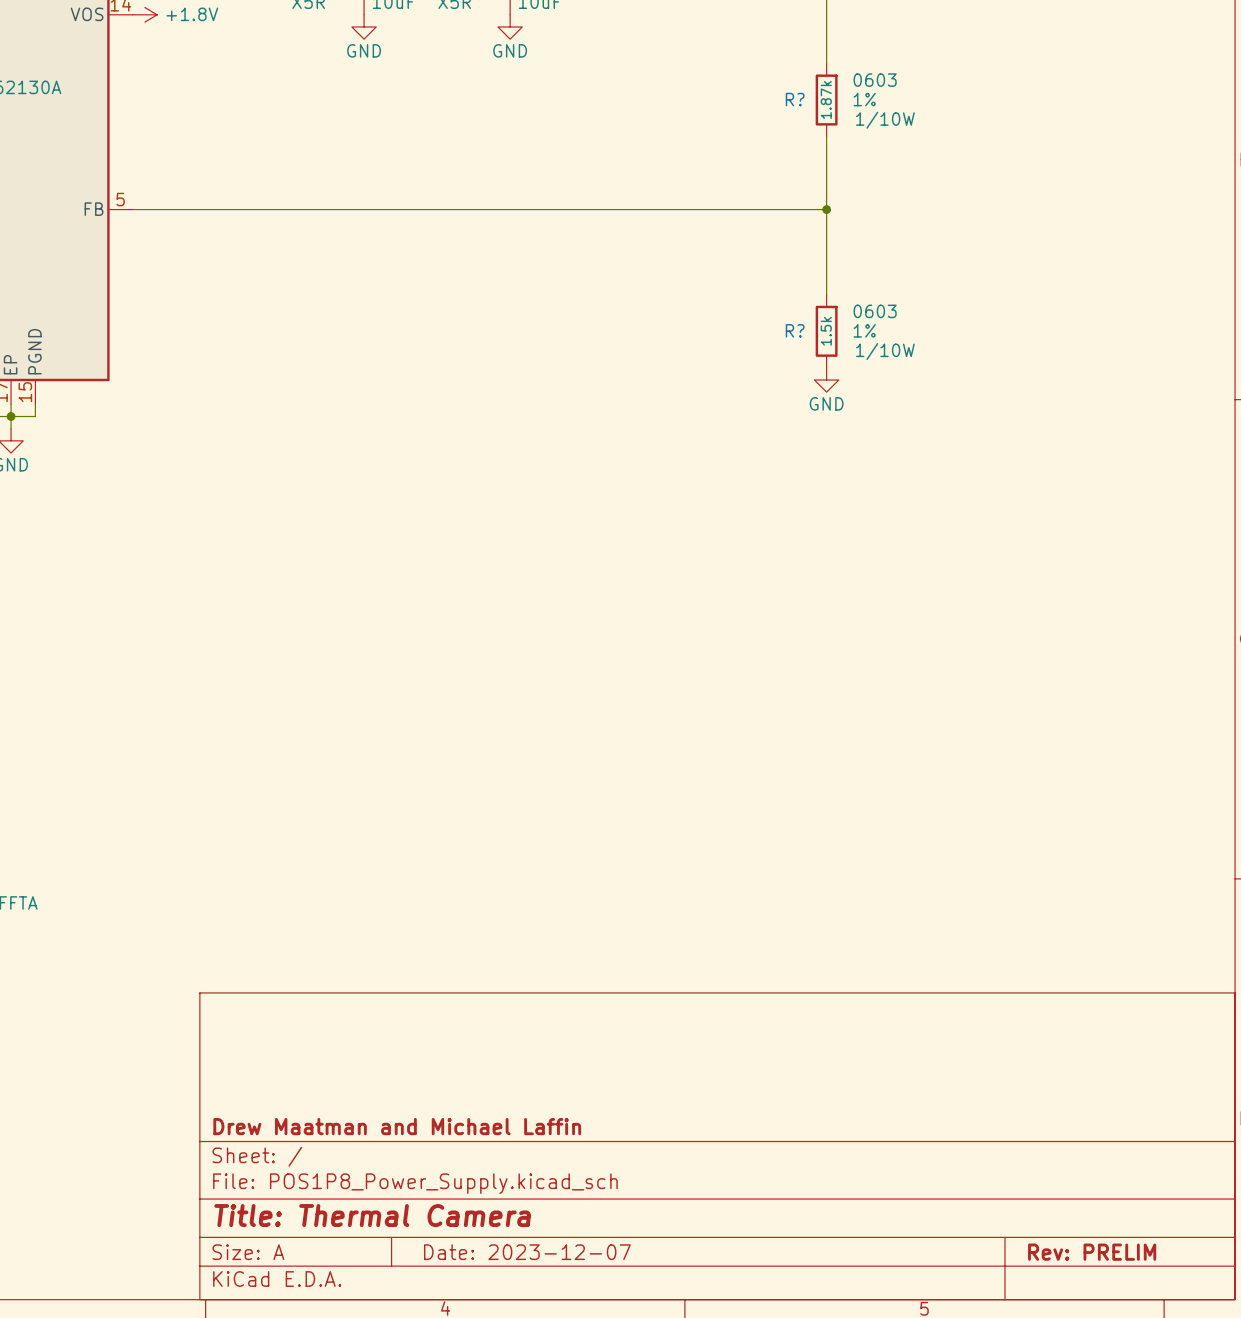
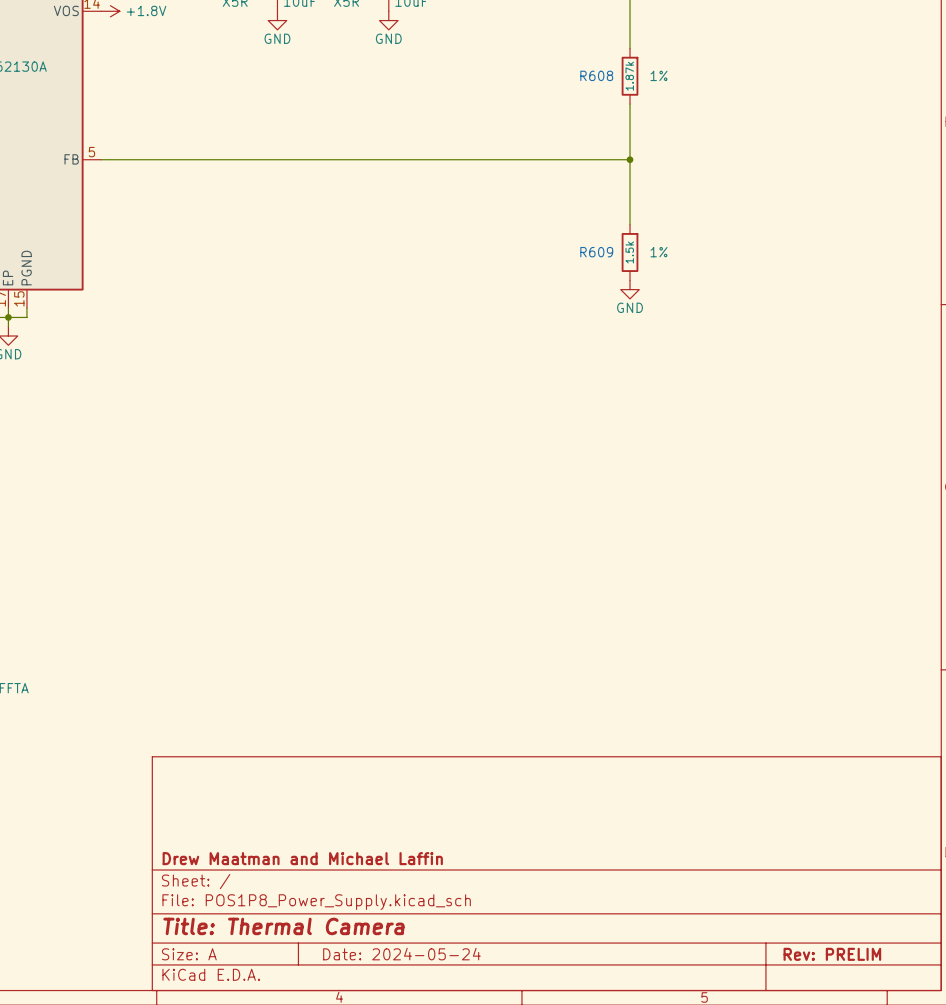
R? text: 0603 (875, 80) -> none
R? name: R? (795, 99) -> R608 (596, 75)
R? text: 1/10W (885, 120) -> none
R? text: 0603 (875, 311) -> none
R? name: R? (795, 330) -> R609 (596, 252)
R? text: 1/10W (885, 351) -> none
title block: Date: 2023-12-07 (527, 1252) -> Date: 2024-05-24 (401, 954)

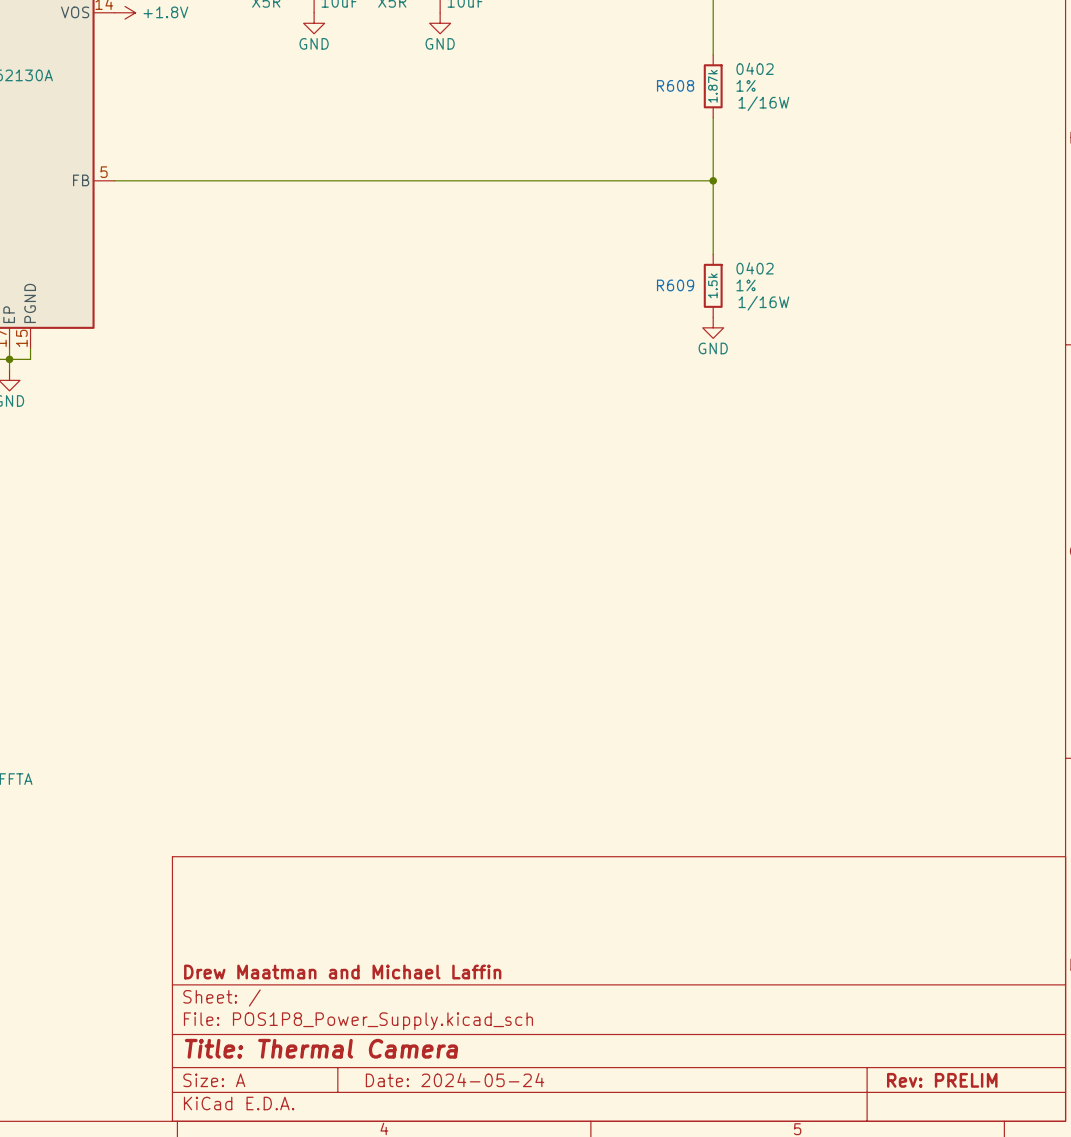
R608 text: none -> 0402 (755, 68)
R608 text: none -> 1/16W (763, 103)
R609 text: none -> 0402 (755, 268)
R609 text: none -> 1/16W (763, 303)

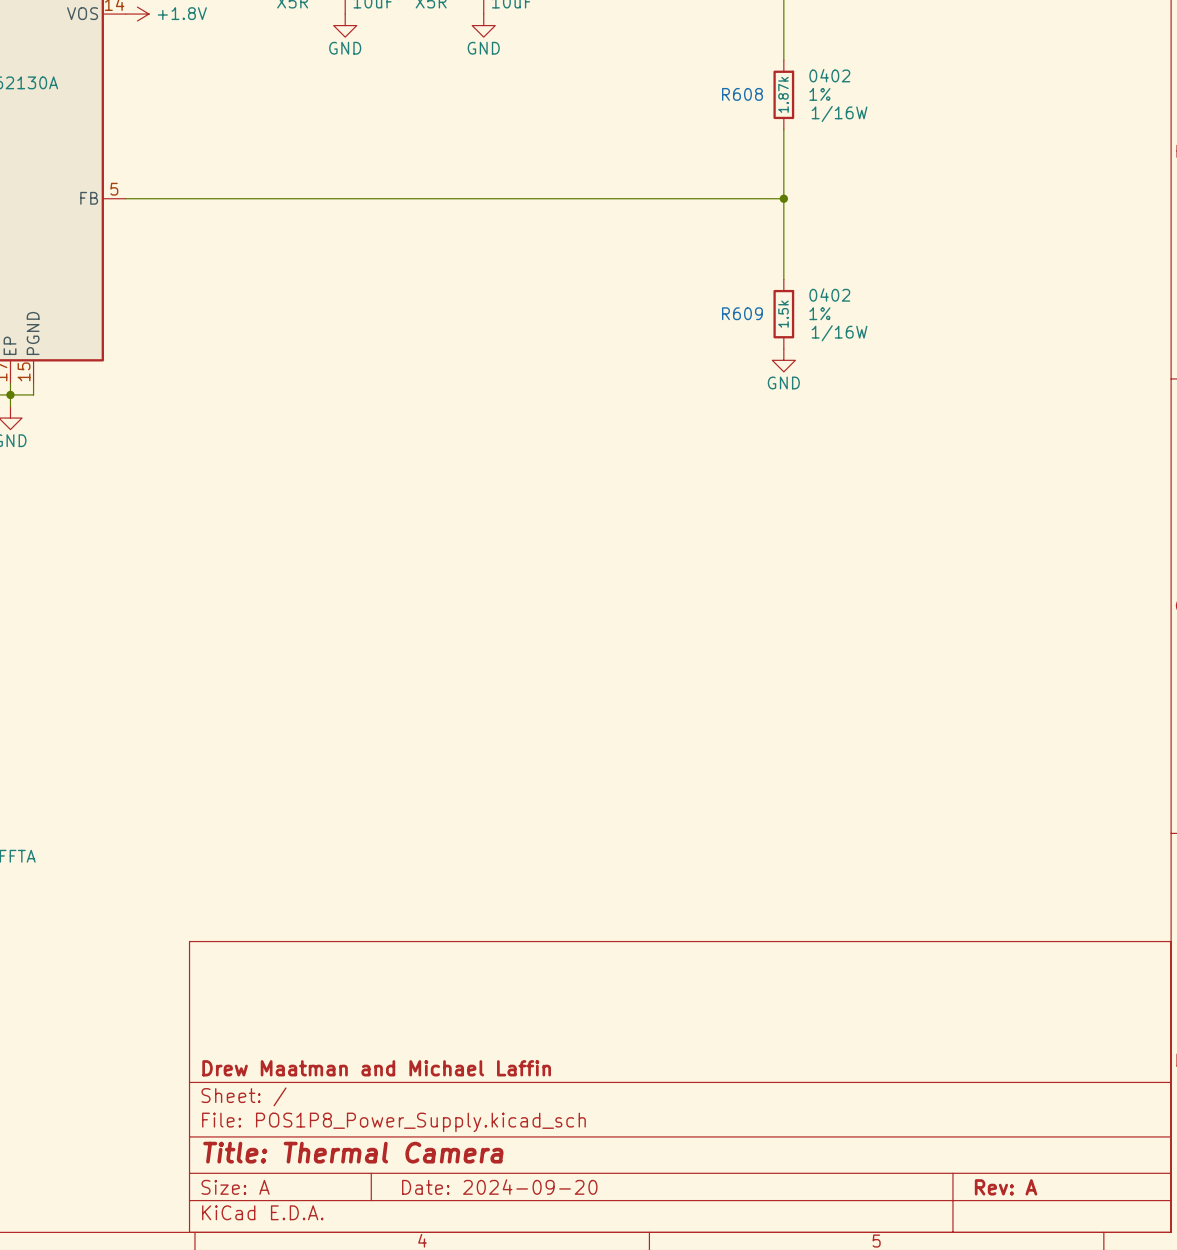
title block: Date: 2024-05-24 (455, 1080) -> Date: 2024-09-20 (499, 1187)
title block: Rev: PRELIM (942, 1080) -> Rev: A (1006, 1187)

